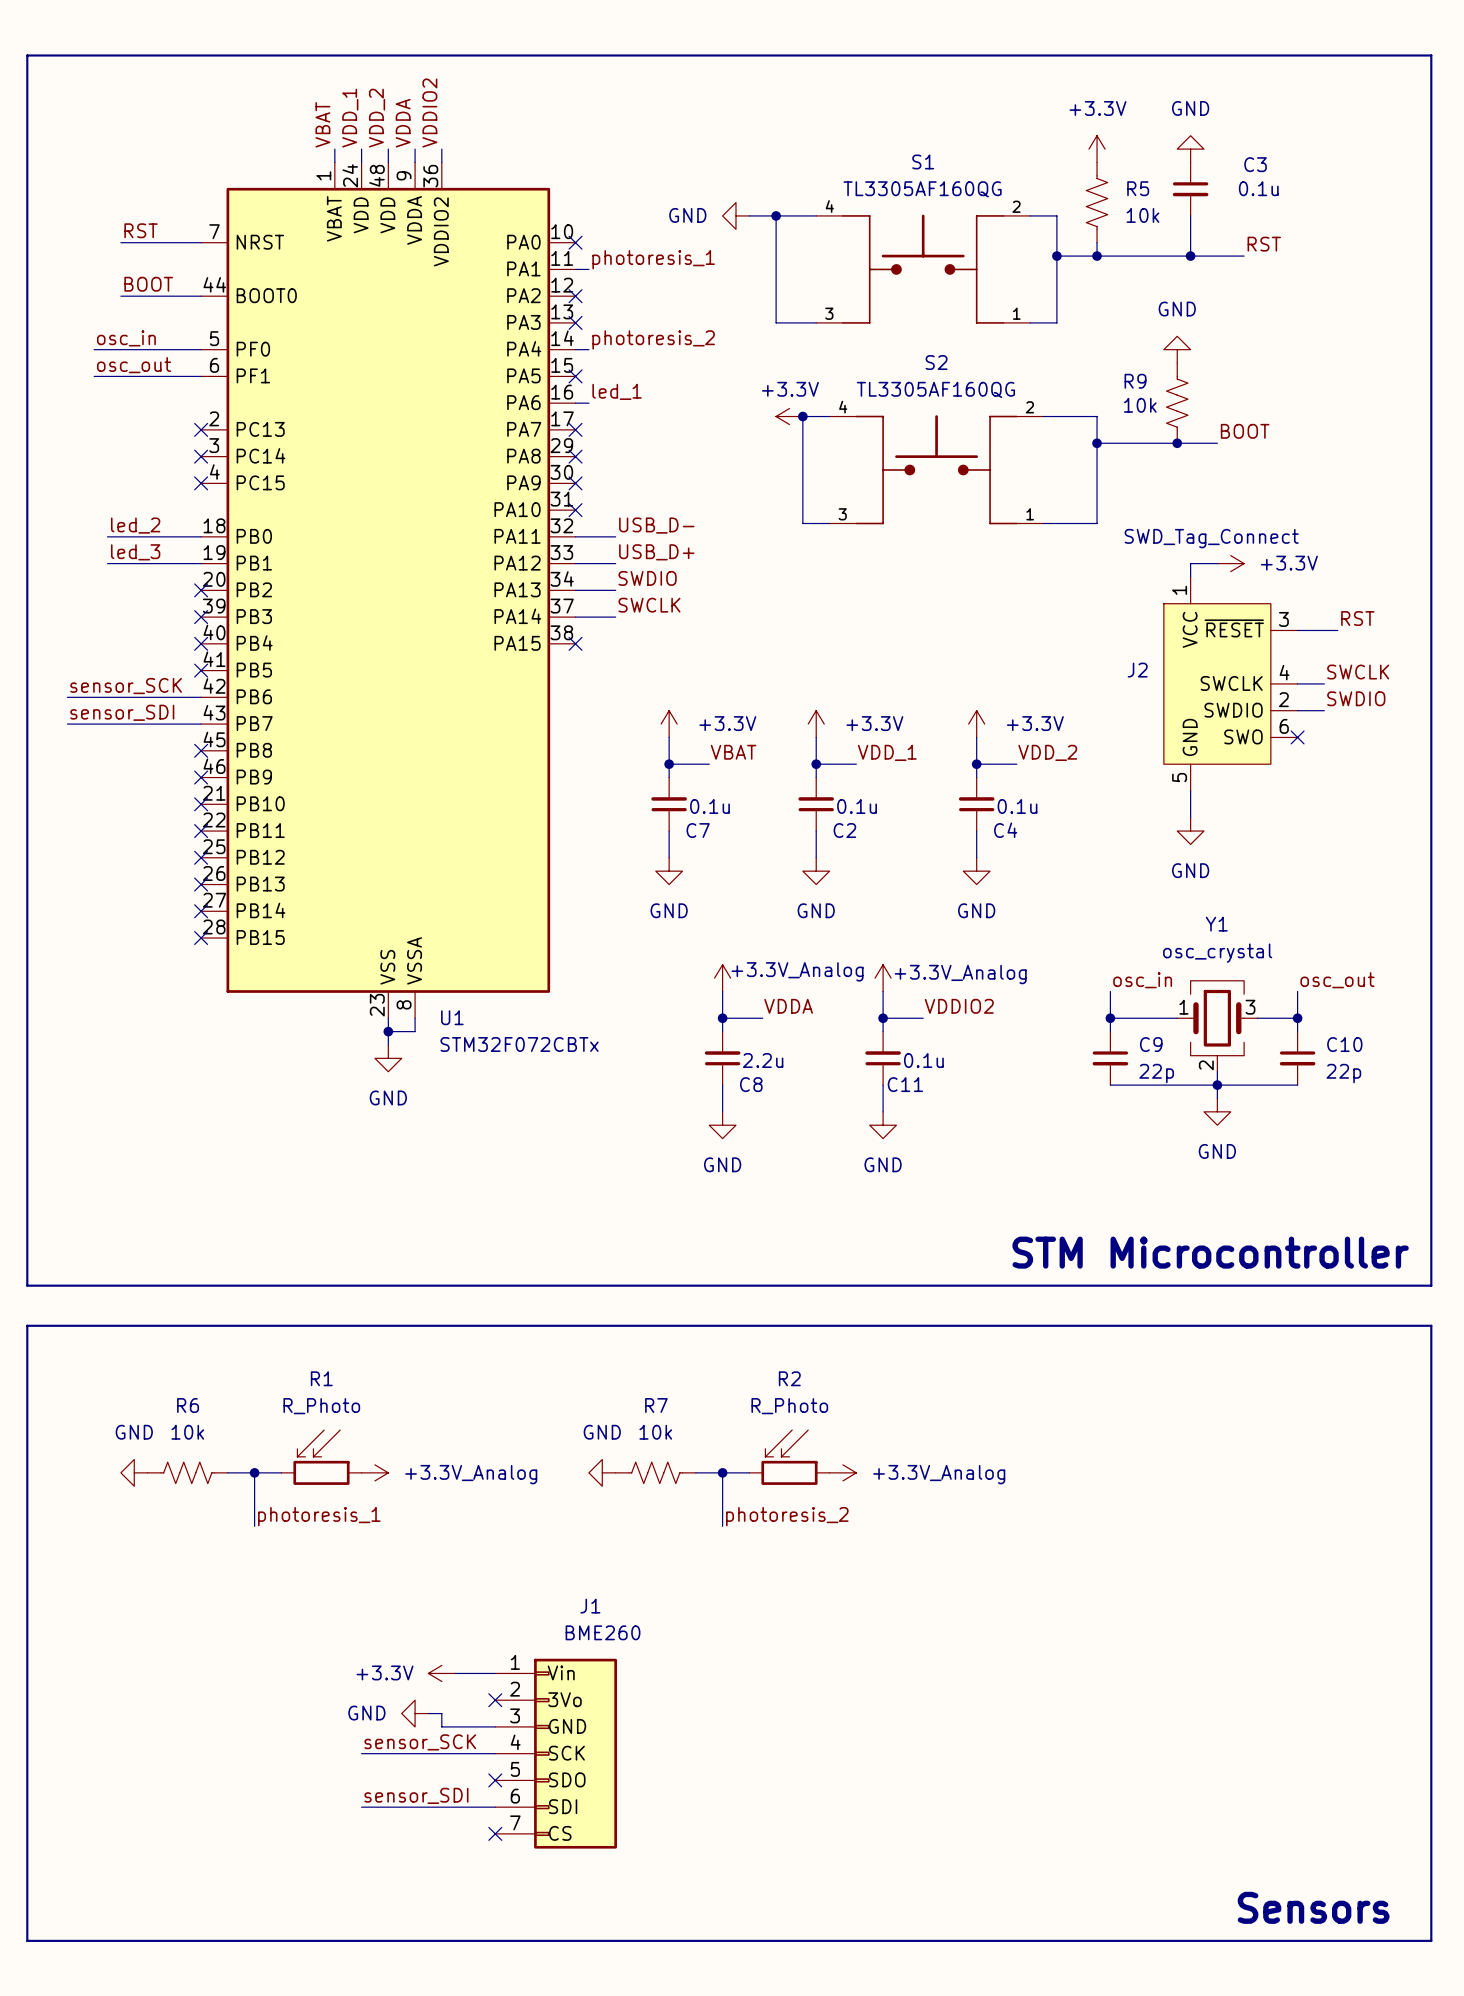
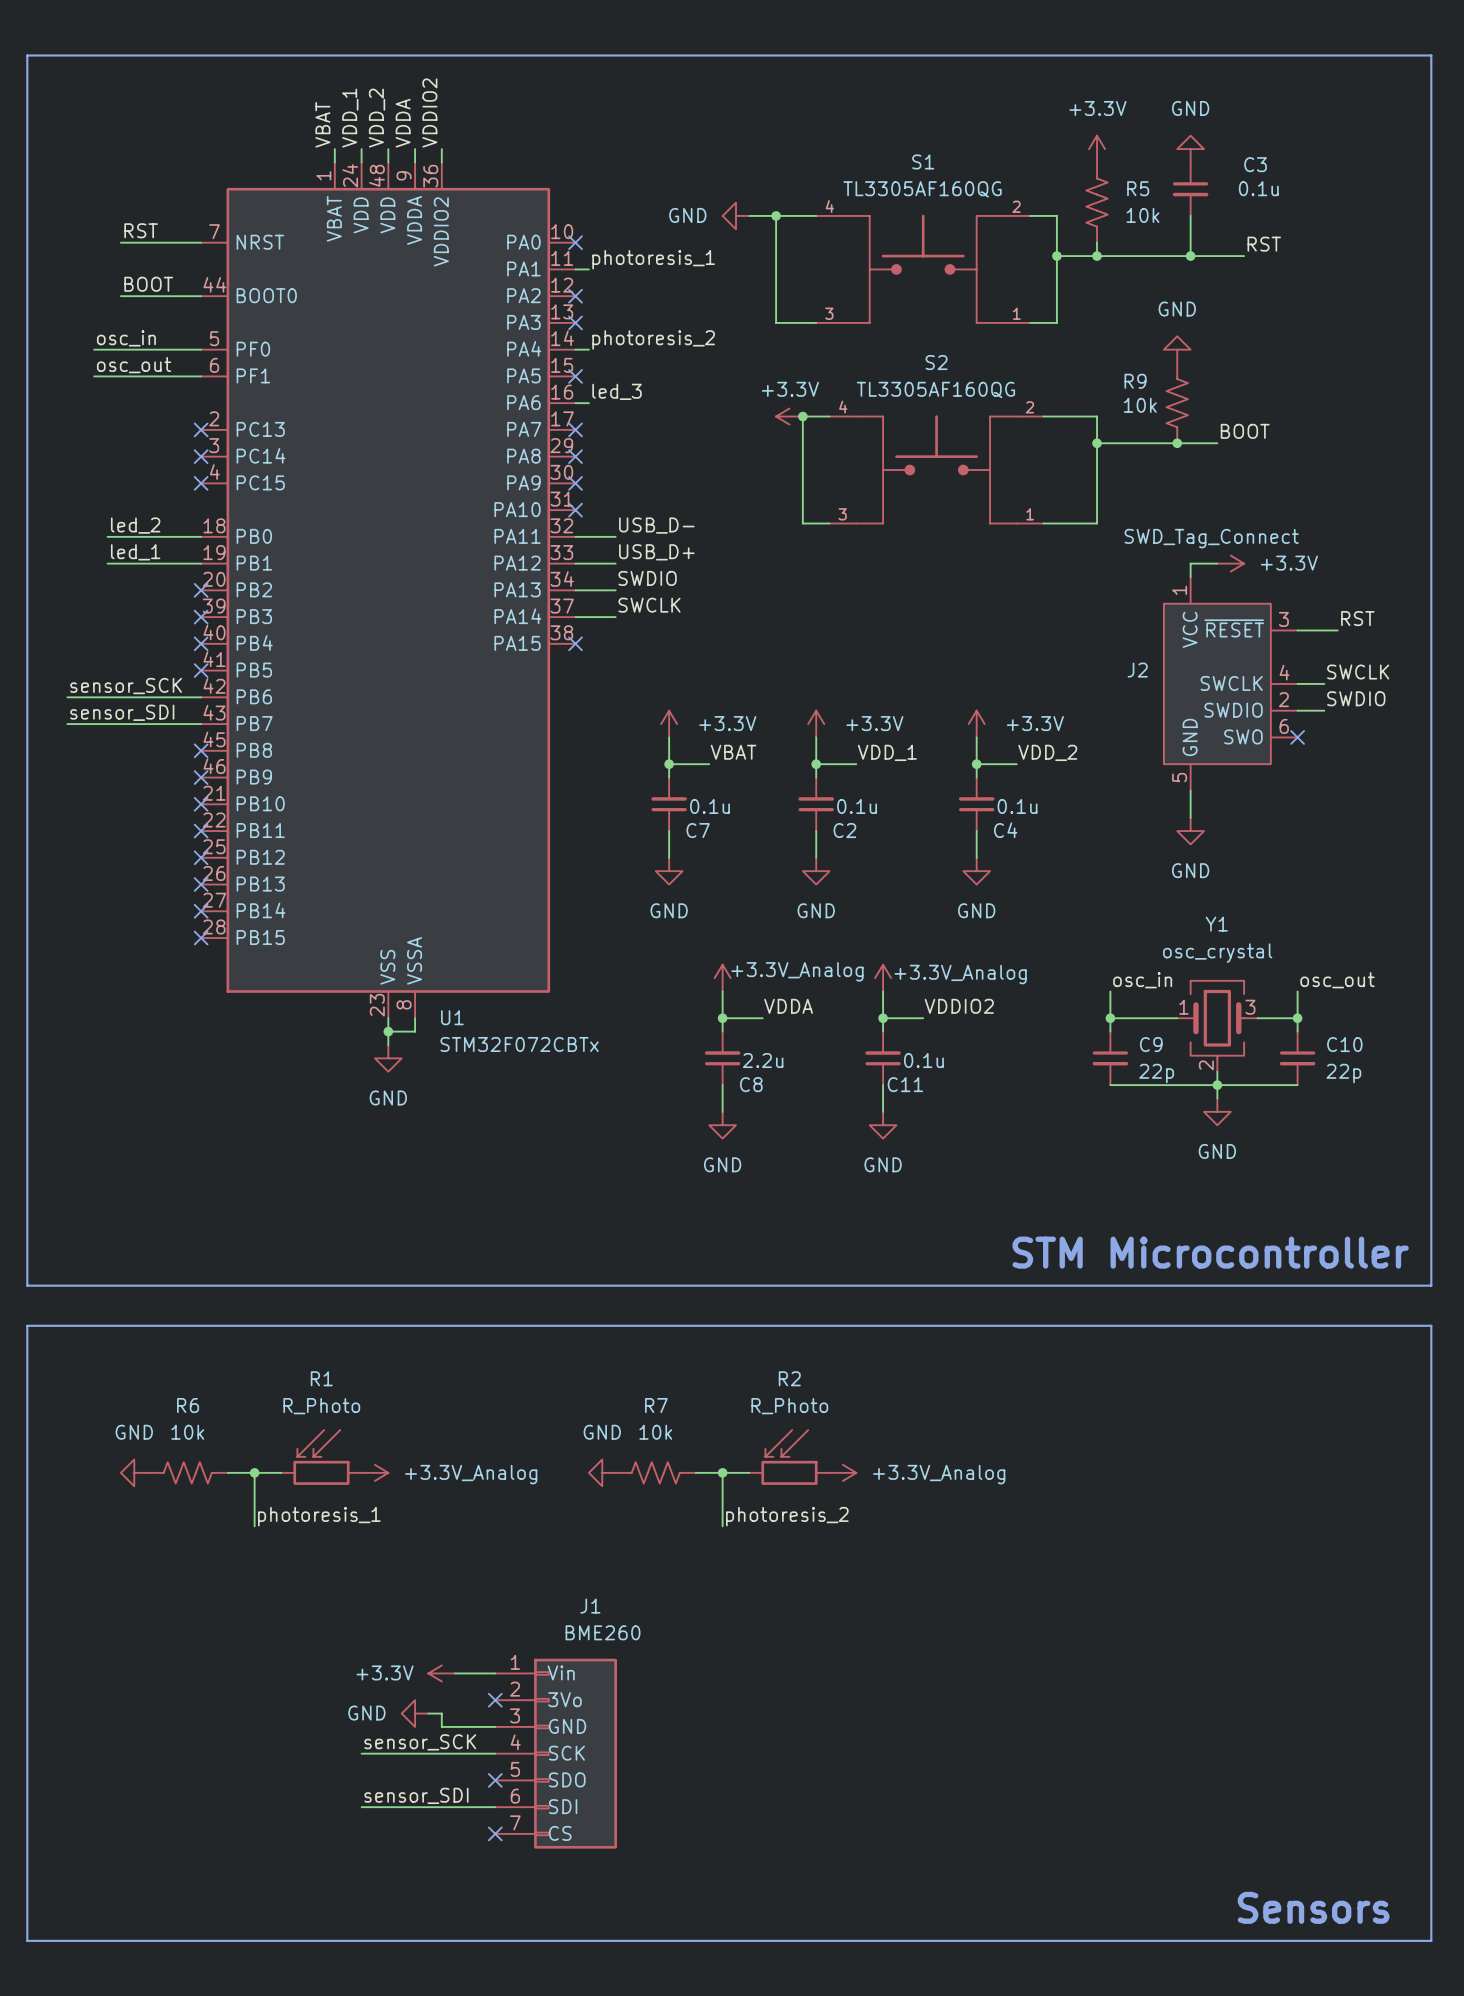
label: led_1 (617, 391) -> led_3 (617, 391)
label: led_3 (135, 552) -> led_1 (135, 552)

